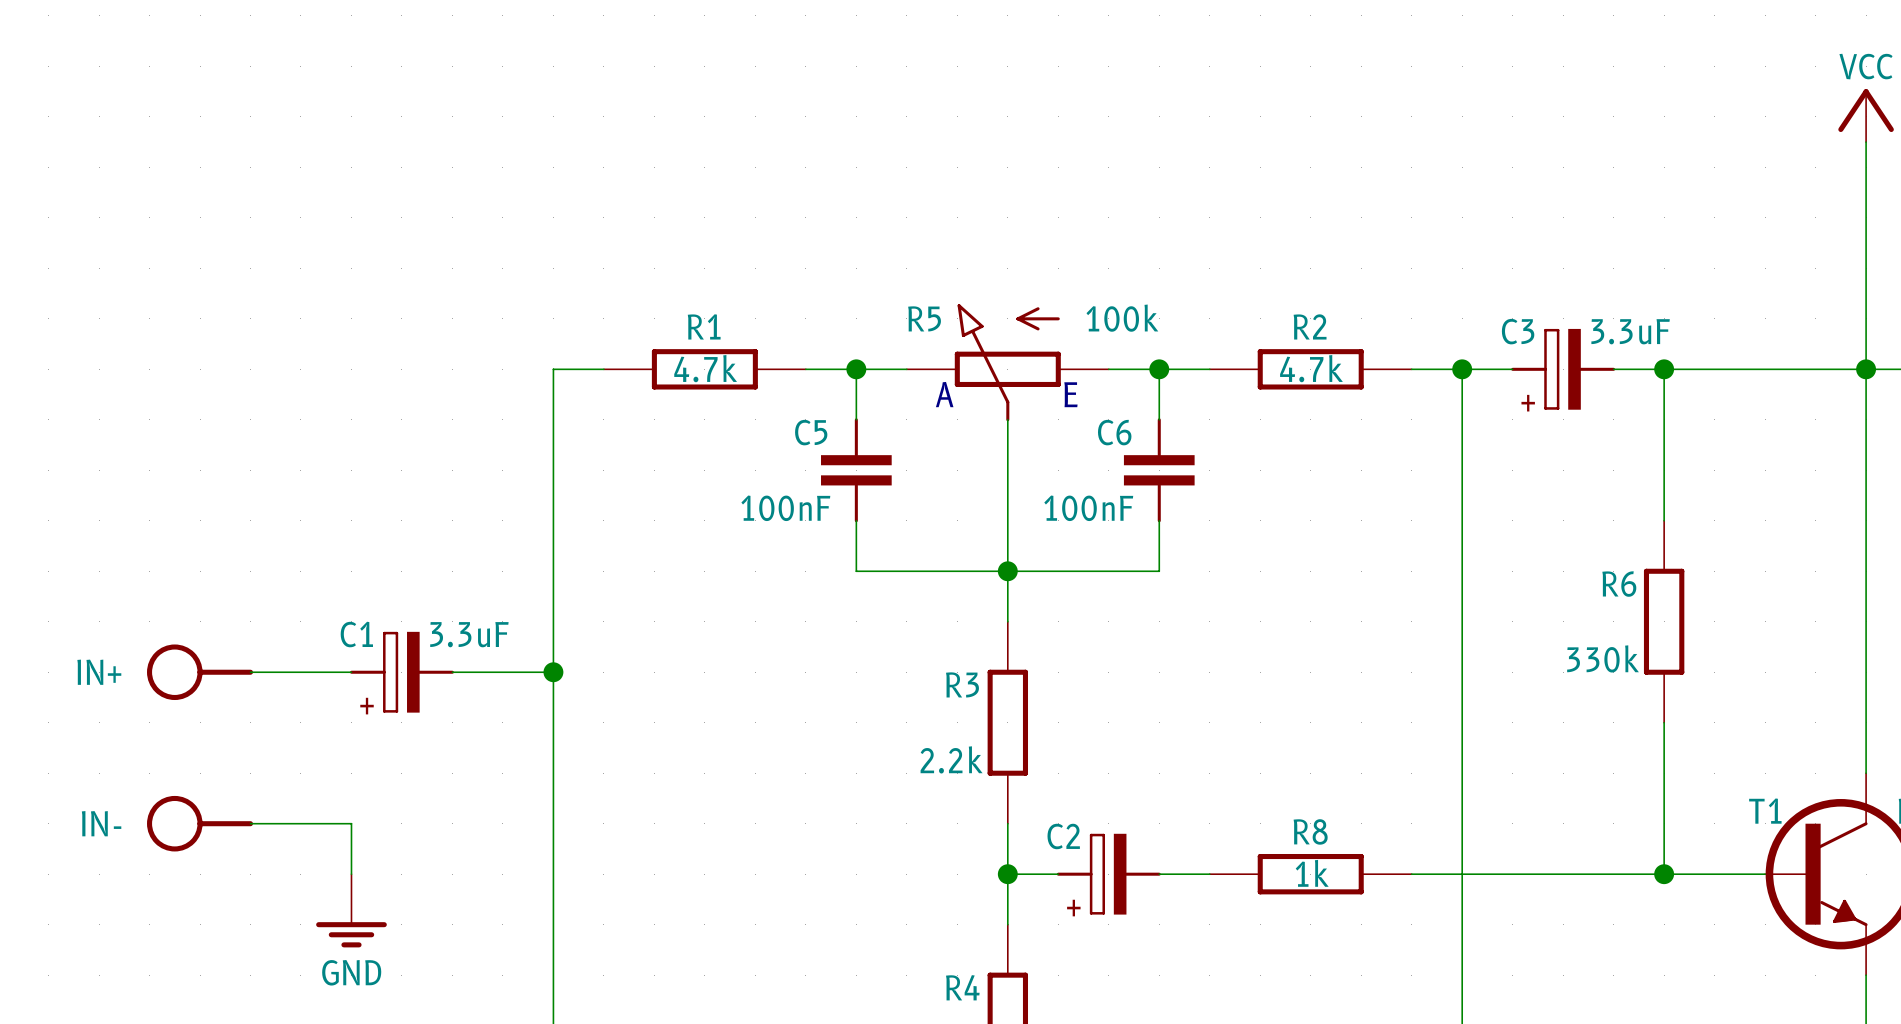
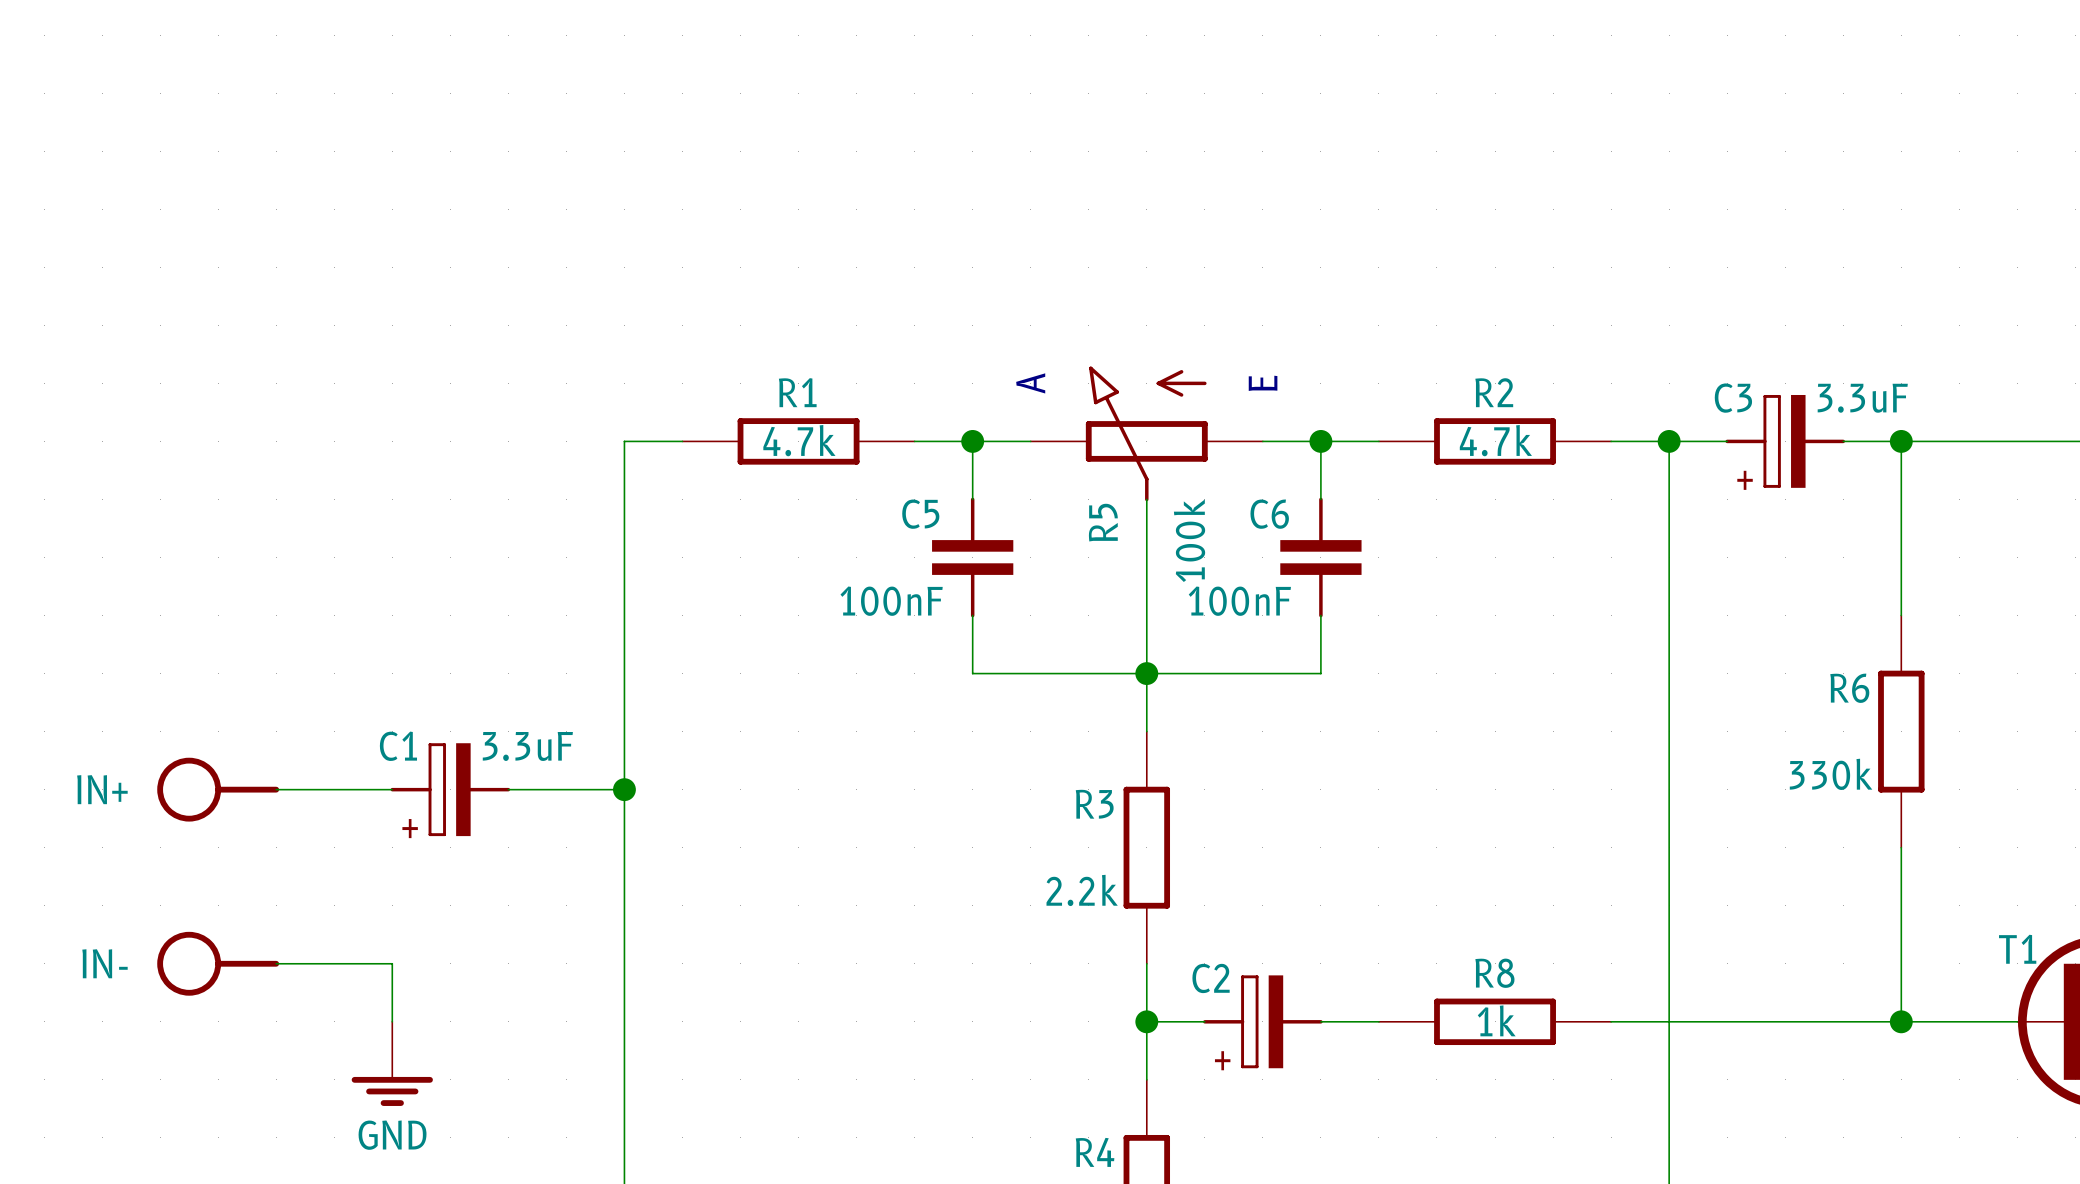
R5 name rotation: 0° (924, 318) -> 90° counterclockwise (1103, 522)
R5 name position: R5 (924, 318) -> R5 (1103, 522)
R5 value rotation: 0° (1122, 318) -> 90° counterclockwise (1189, 540)
R5 value position: 100k (1122, 318) -> 100k (1189, 540)
R5 text rotation: 0° (944, 394) -> 90° counterclockwise (1030, 383)
R5 text position: A (944, 394) -> A (1030, 383)
R5 text rotation: 0° (1070, 394) -> 90° counterclockwise (1263, 383)
R5 text position: E (1070, 394) -> E (1263, 383)

